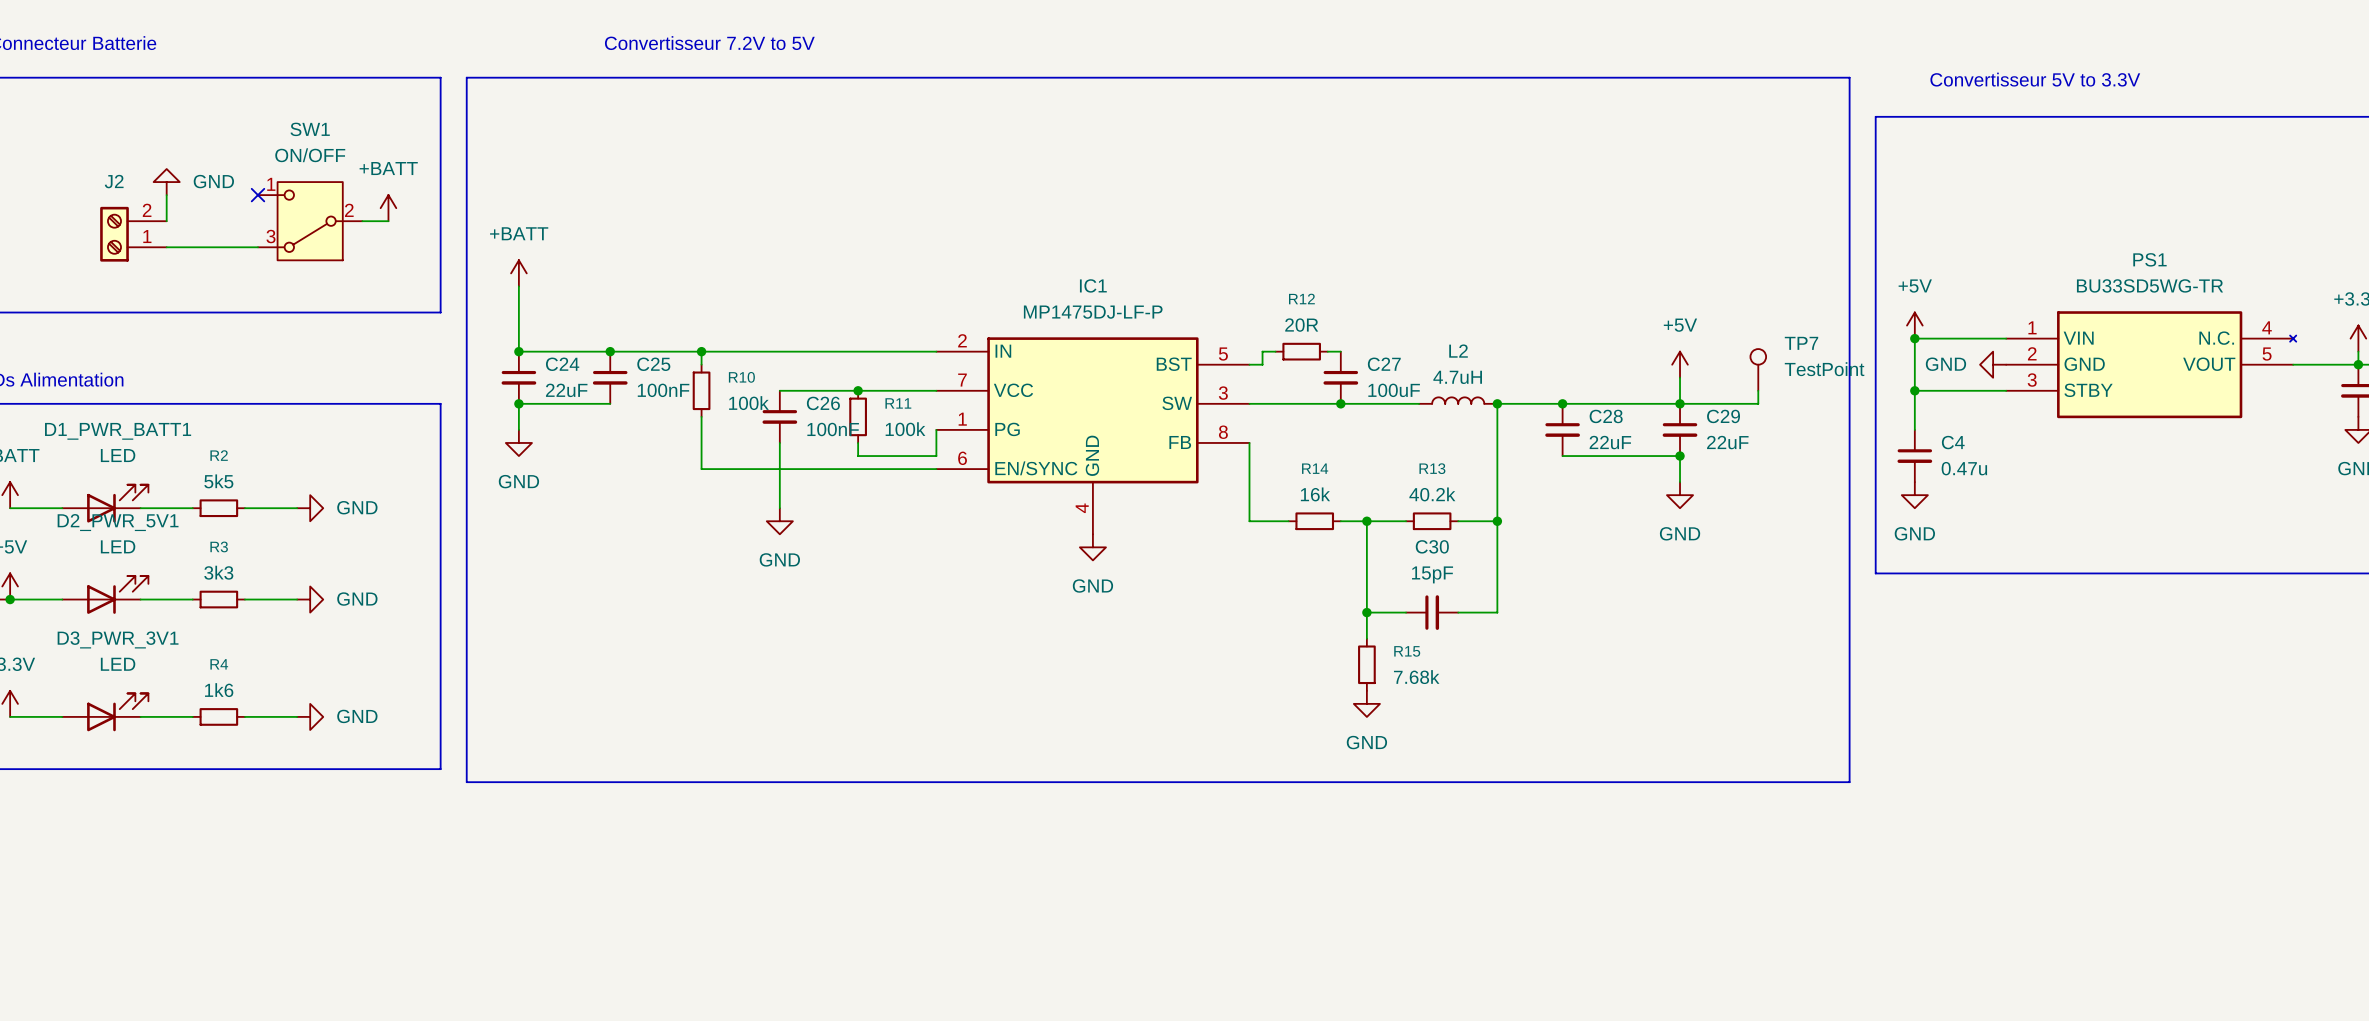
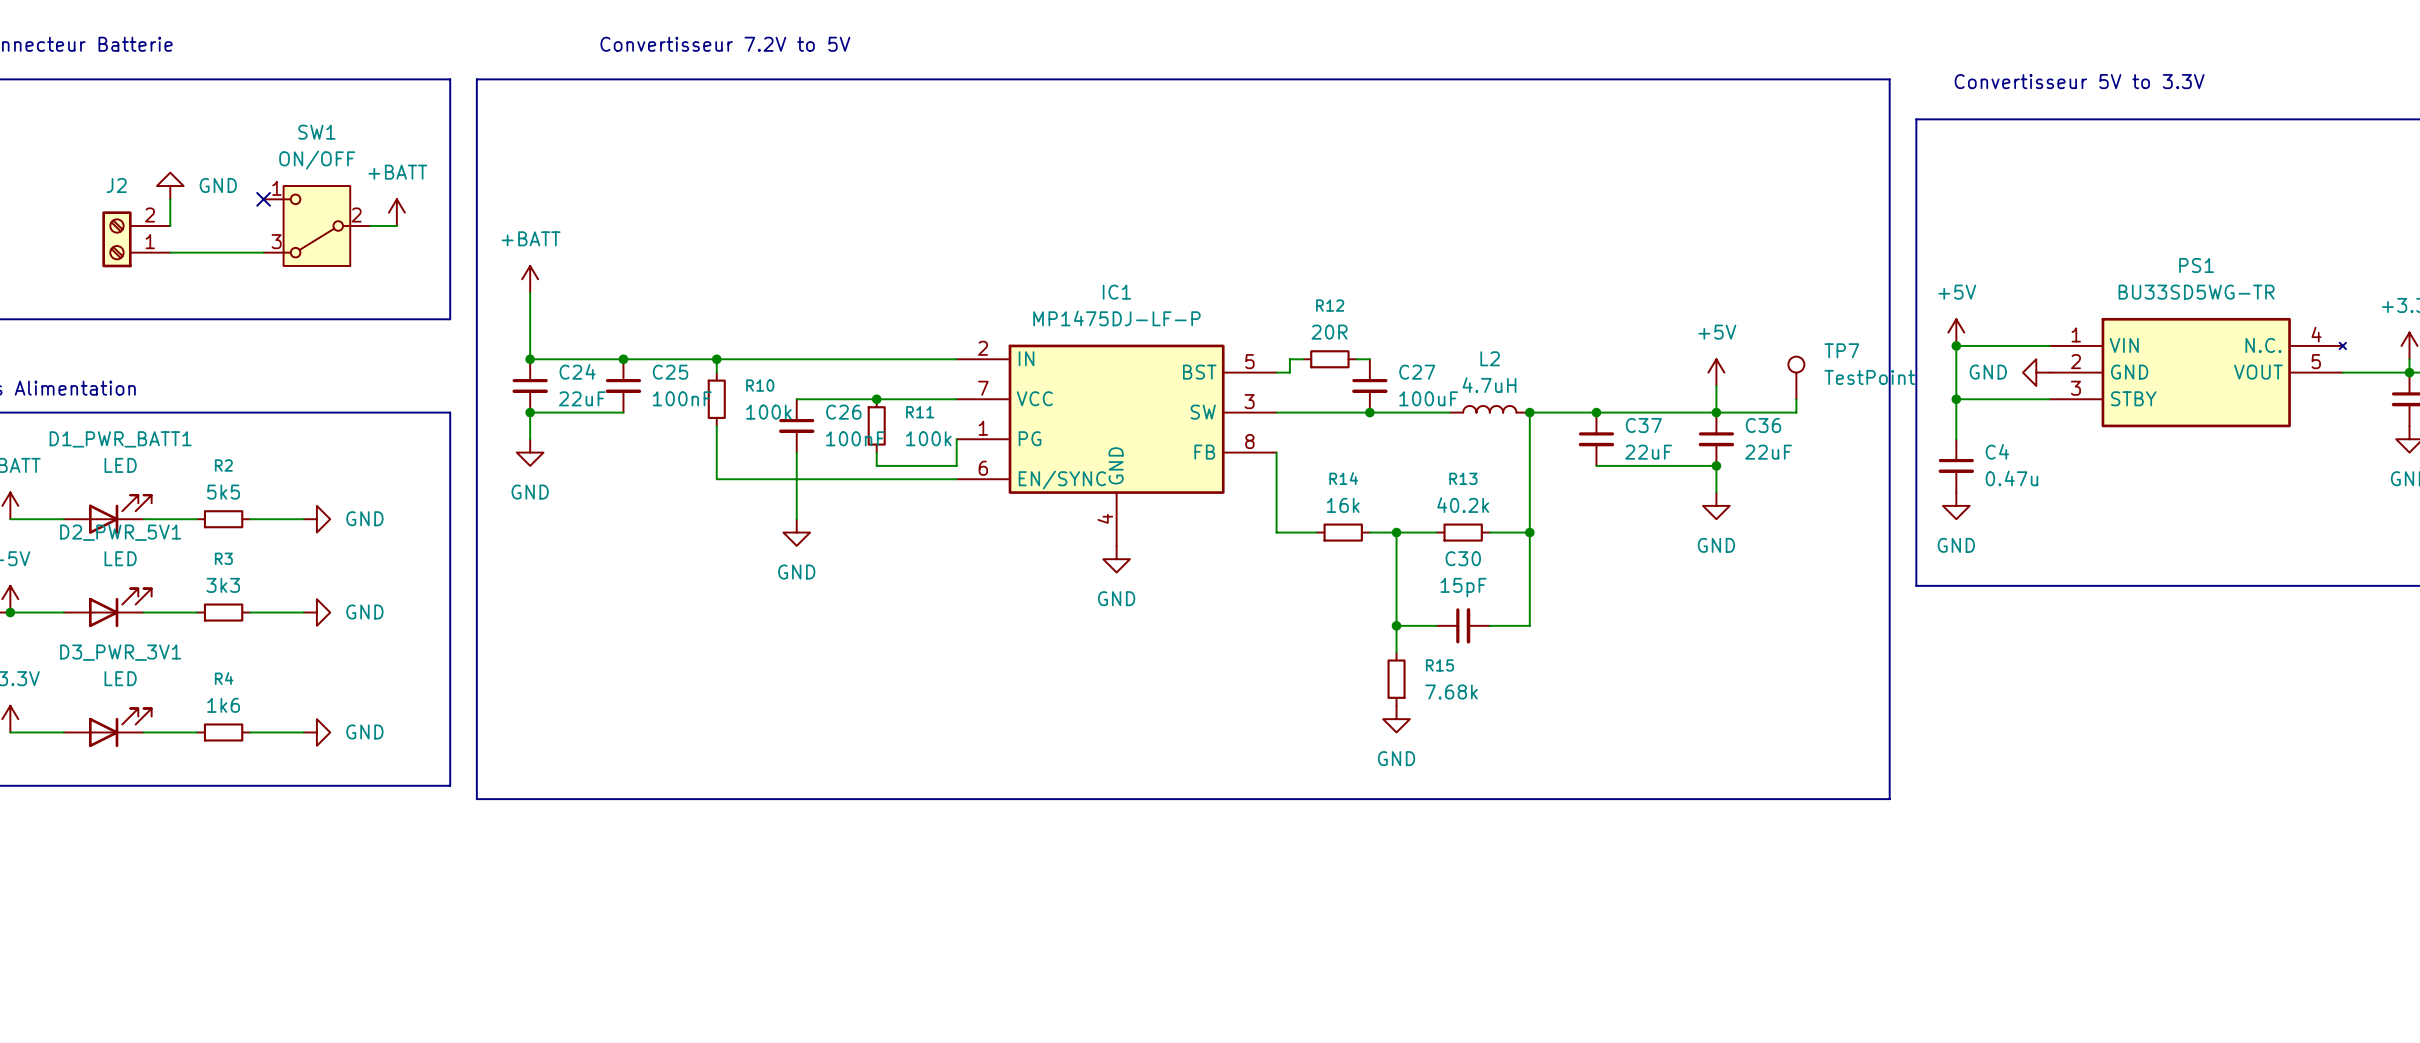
C28 name: C28 (1606, 416) -> C37 (1643, 425)
C29 name: C29 (1723, 416) -> C36 (1763, 425)

